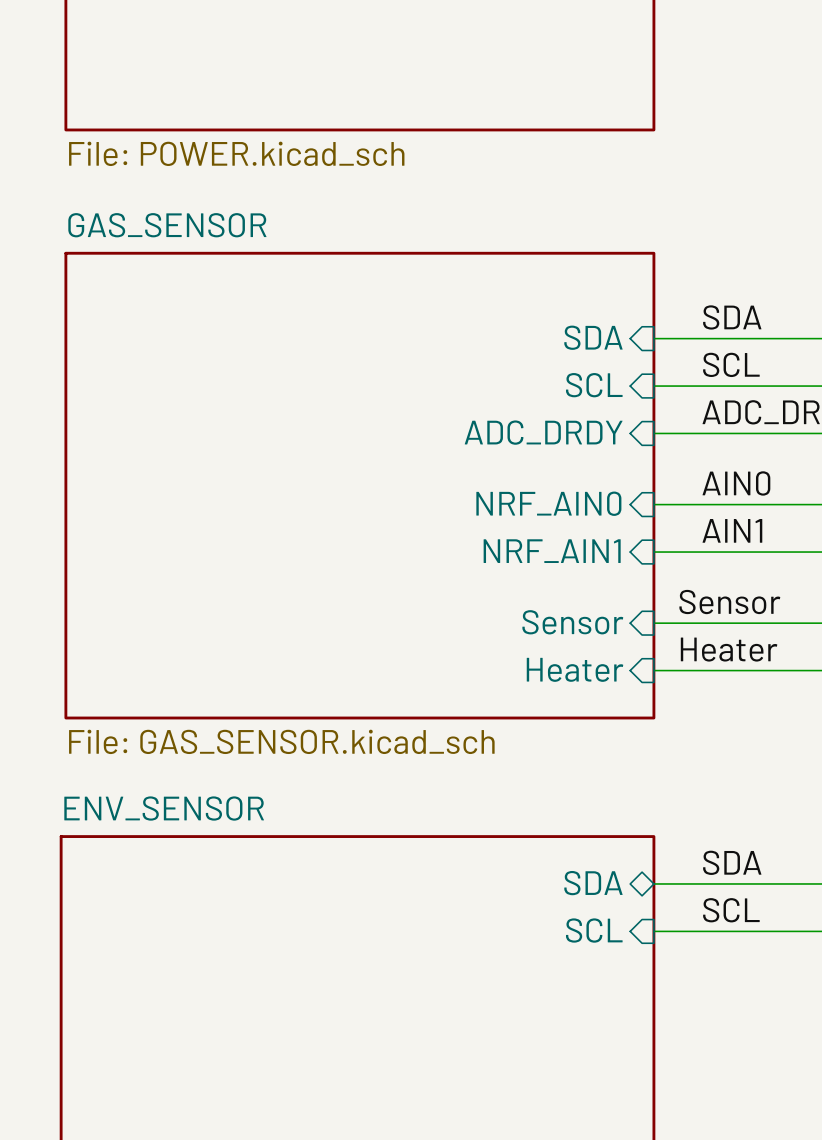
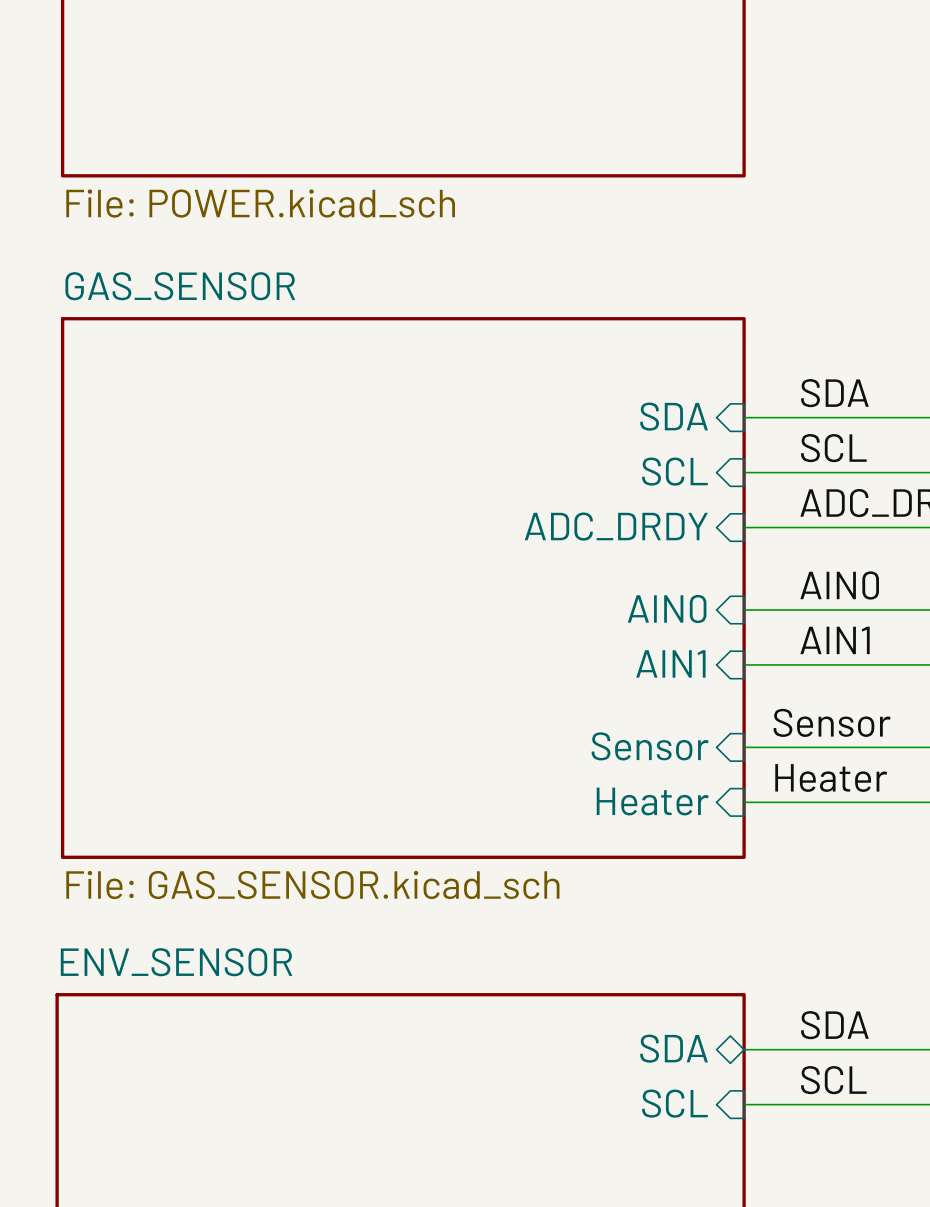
sheet pin: NRF_AIN0 (548, 503) -> AIN0 (667, 608)
sheet pin: NRF_AIN1 (552, 551) -> AIN1 (670, 663)

